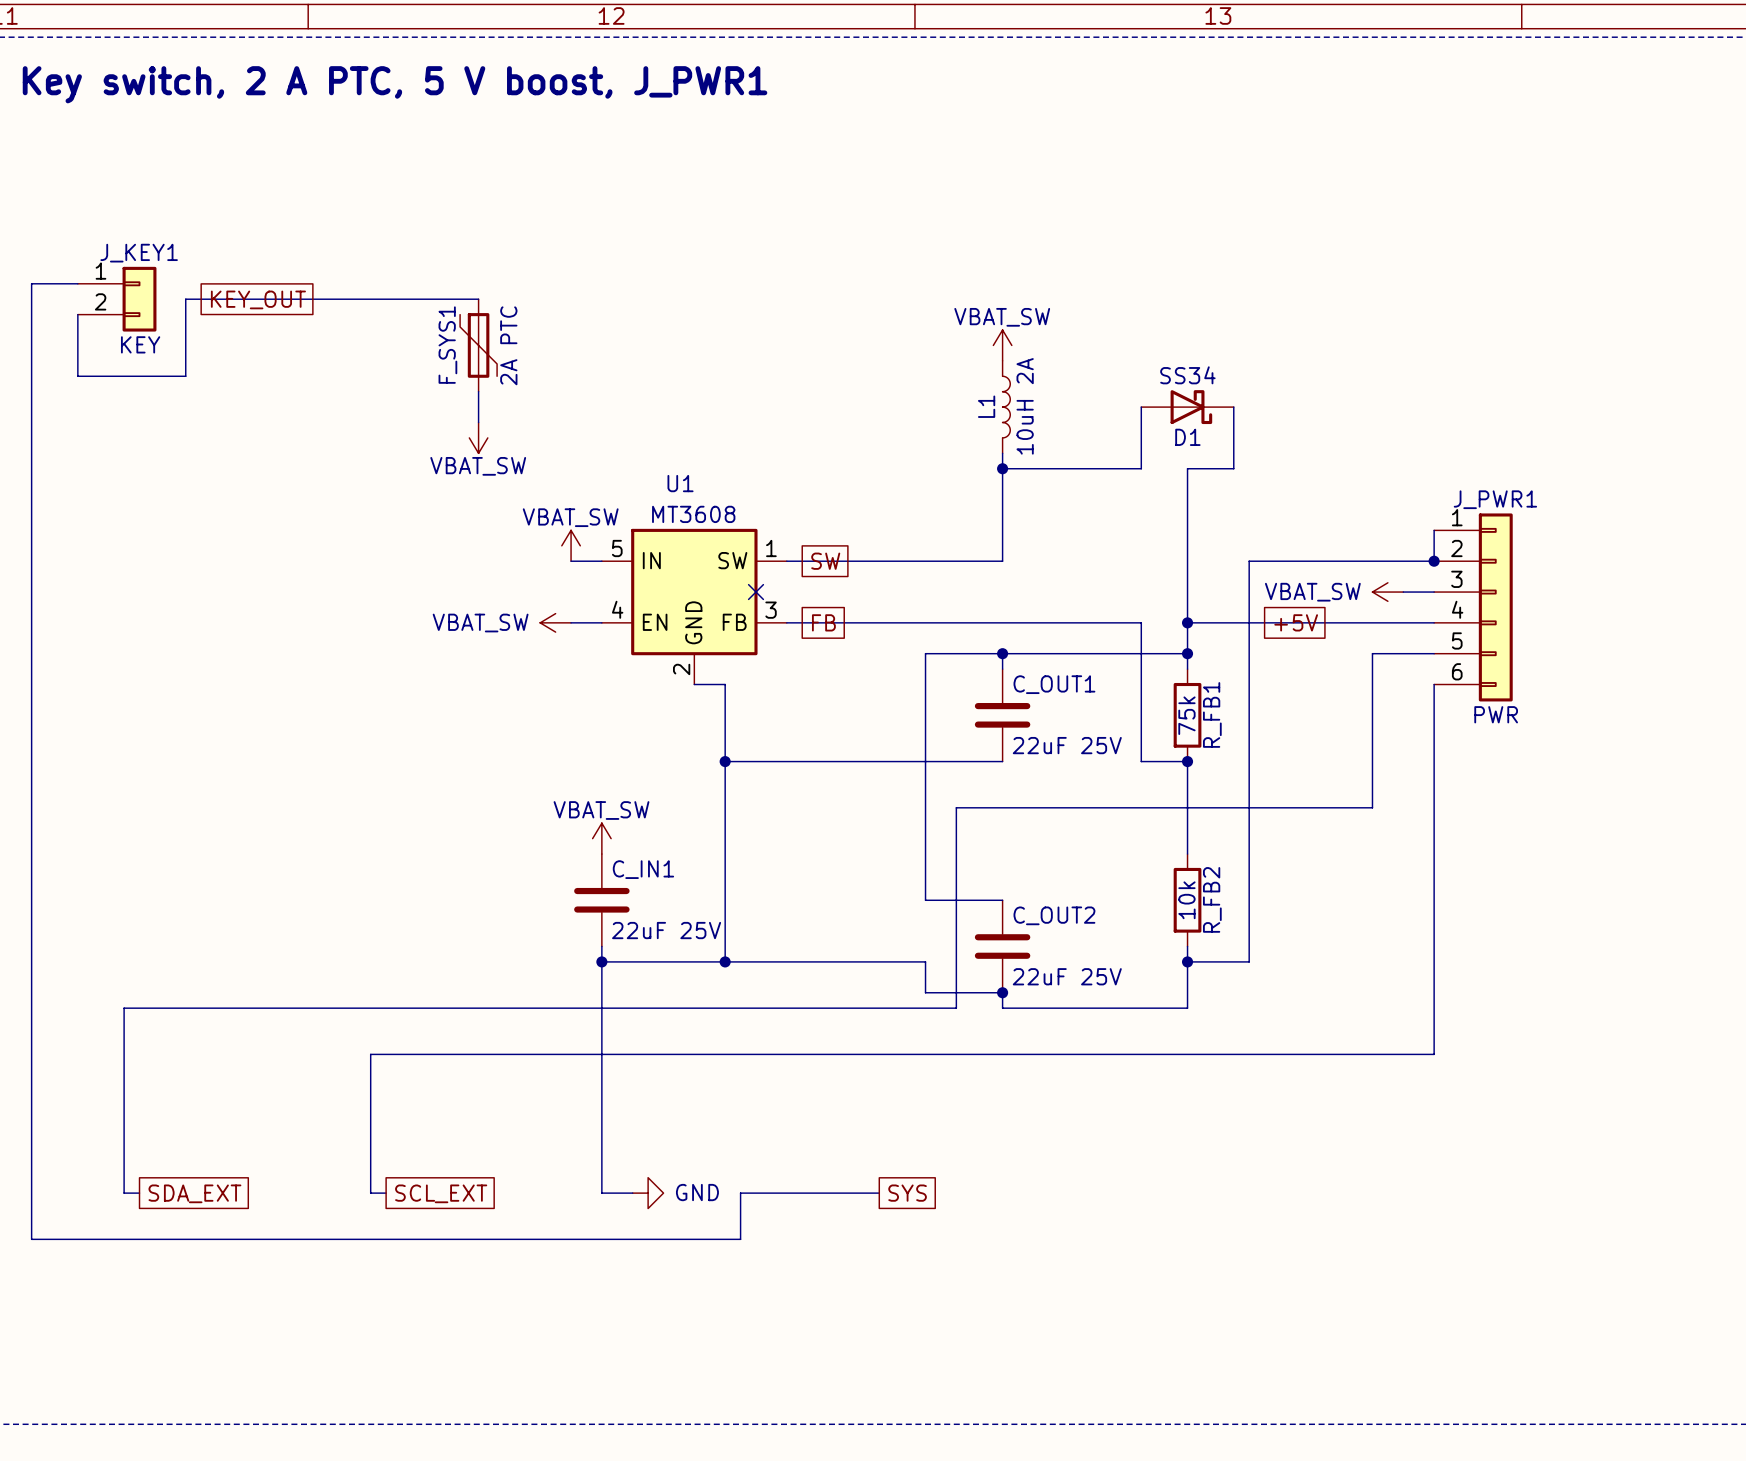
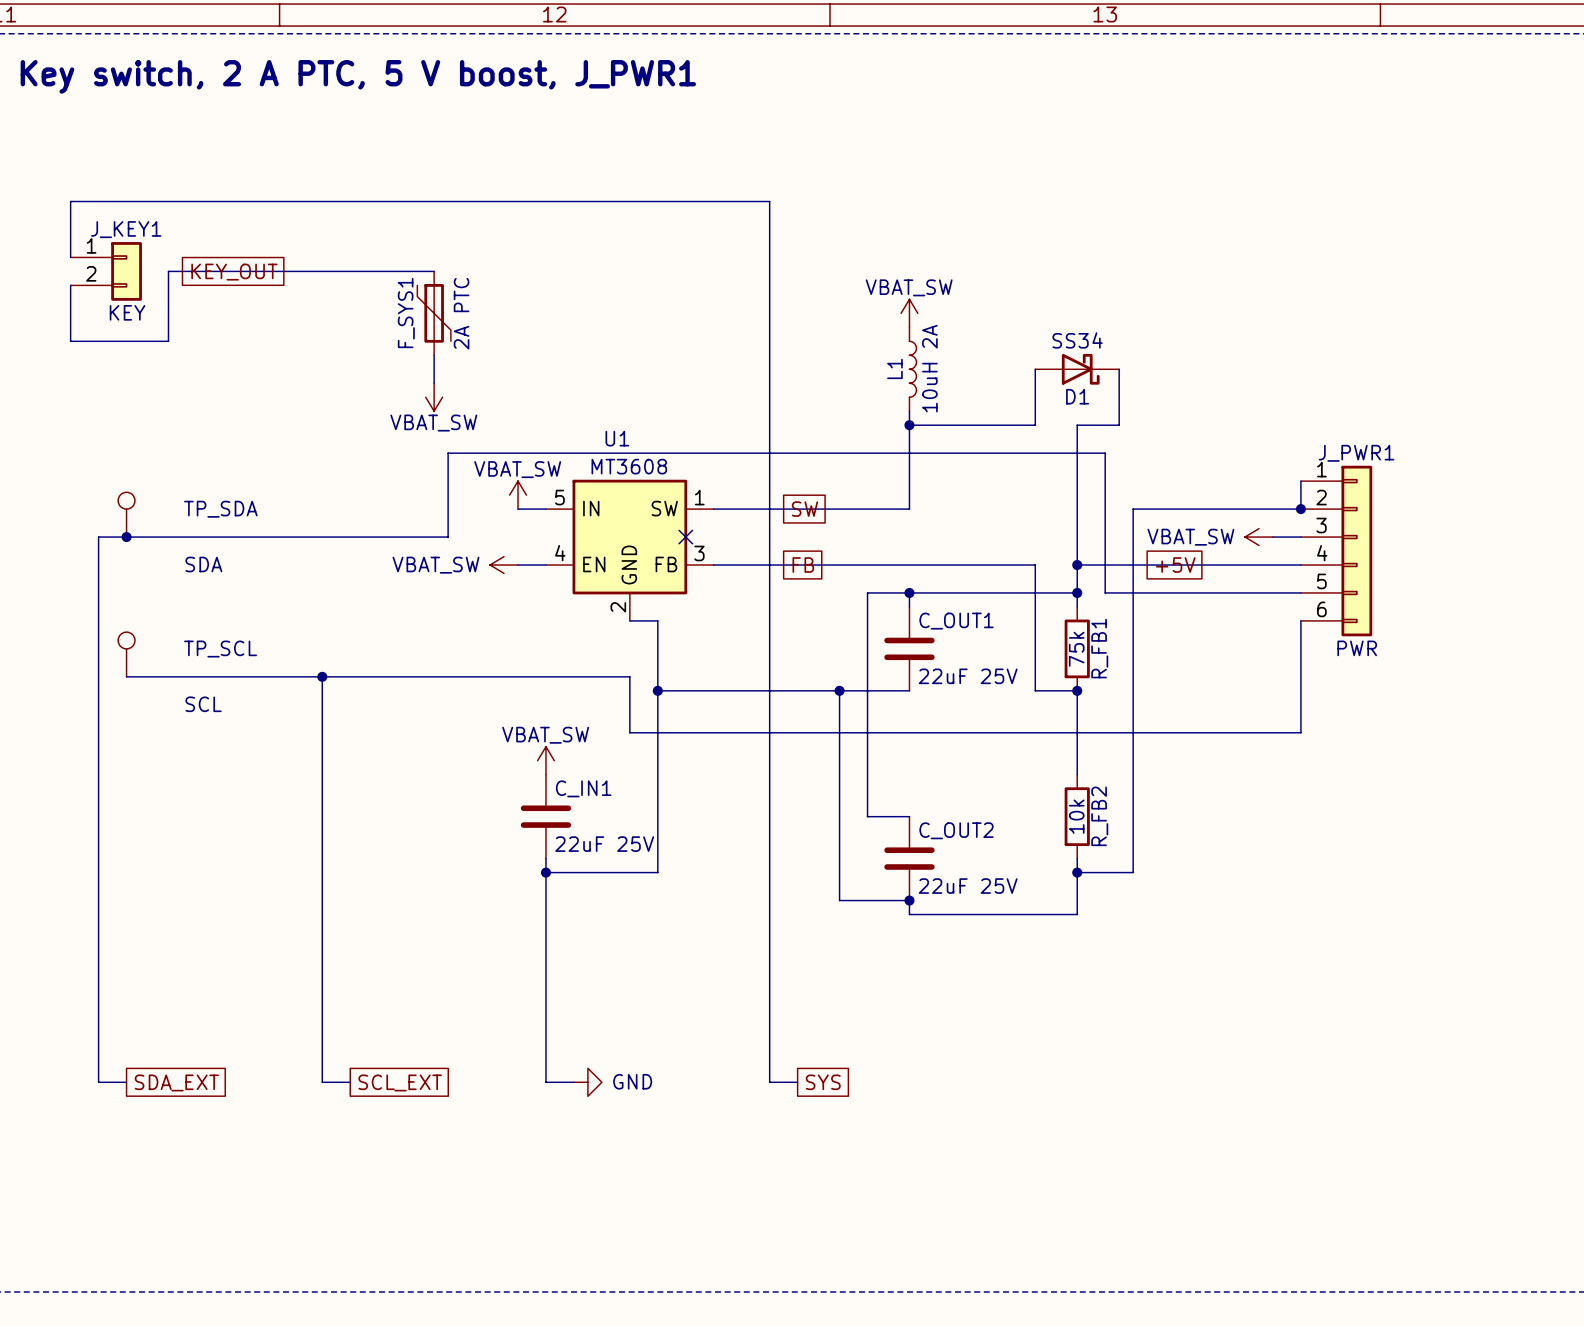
wire: (77, 283) (31, 283) (31, 1239) (740, 1239) (740, 1193) (848, 1193) -> (70, 257) (70, 201) (769, 201) (769, 1082)
global label position: SW (825, 561) -> SW (804, 509)
TP_SDA: none -> SDA (126, 514)
junction: none -> (126, 537)
global label position: FB (823, 622) -> FB (803, 565)
wire: (956, 653) (925, 653) (925, 761) -> (867, 592) (867, 732) (629, 732) (629, 676) (126, 676)
wire: (1372, 653) (1372, 807) -> (1300, 732) (1245, 732)
TP_SCL: none -> SCL (126, 654)
junction: none -> (322, 676)
junction: none -> (839, 690)
wire: (1434, 807) (1434, 1054) (370, 1054) (370, 1193) -> (322, 676) (322, 1082) (336, 1082)
wire: (925, 900) (956, 900) (956, 1008) (124, 1008) (124, 1193) -> (1245, 592) (1105, 592) (1105, 453) (448, 453) (448, 537) (98, 537) (98, 1082) (112, 1082)
wire: (725, 961) (925, 961) -> (839, 816) (839, 872)
junction: (725, 961) -> none

